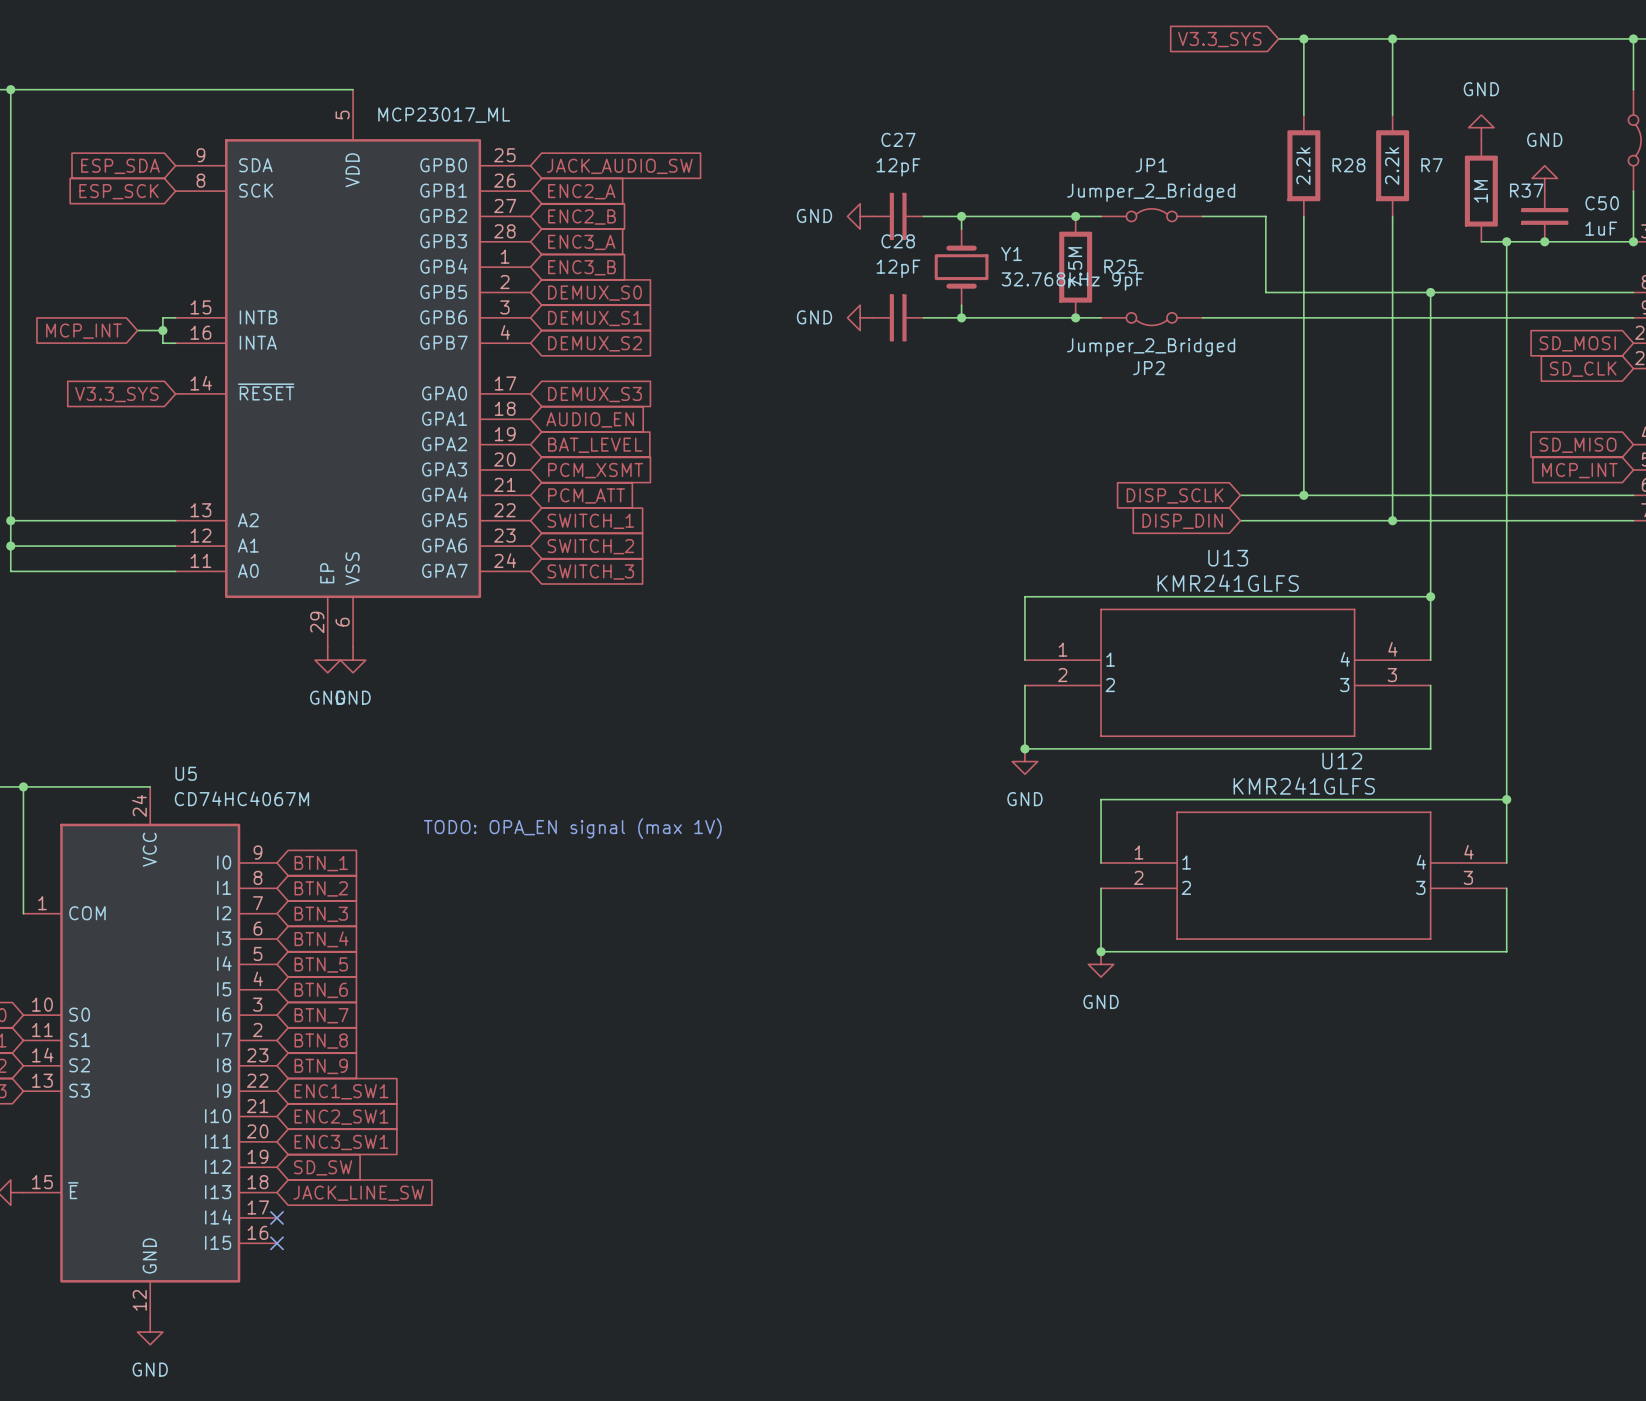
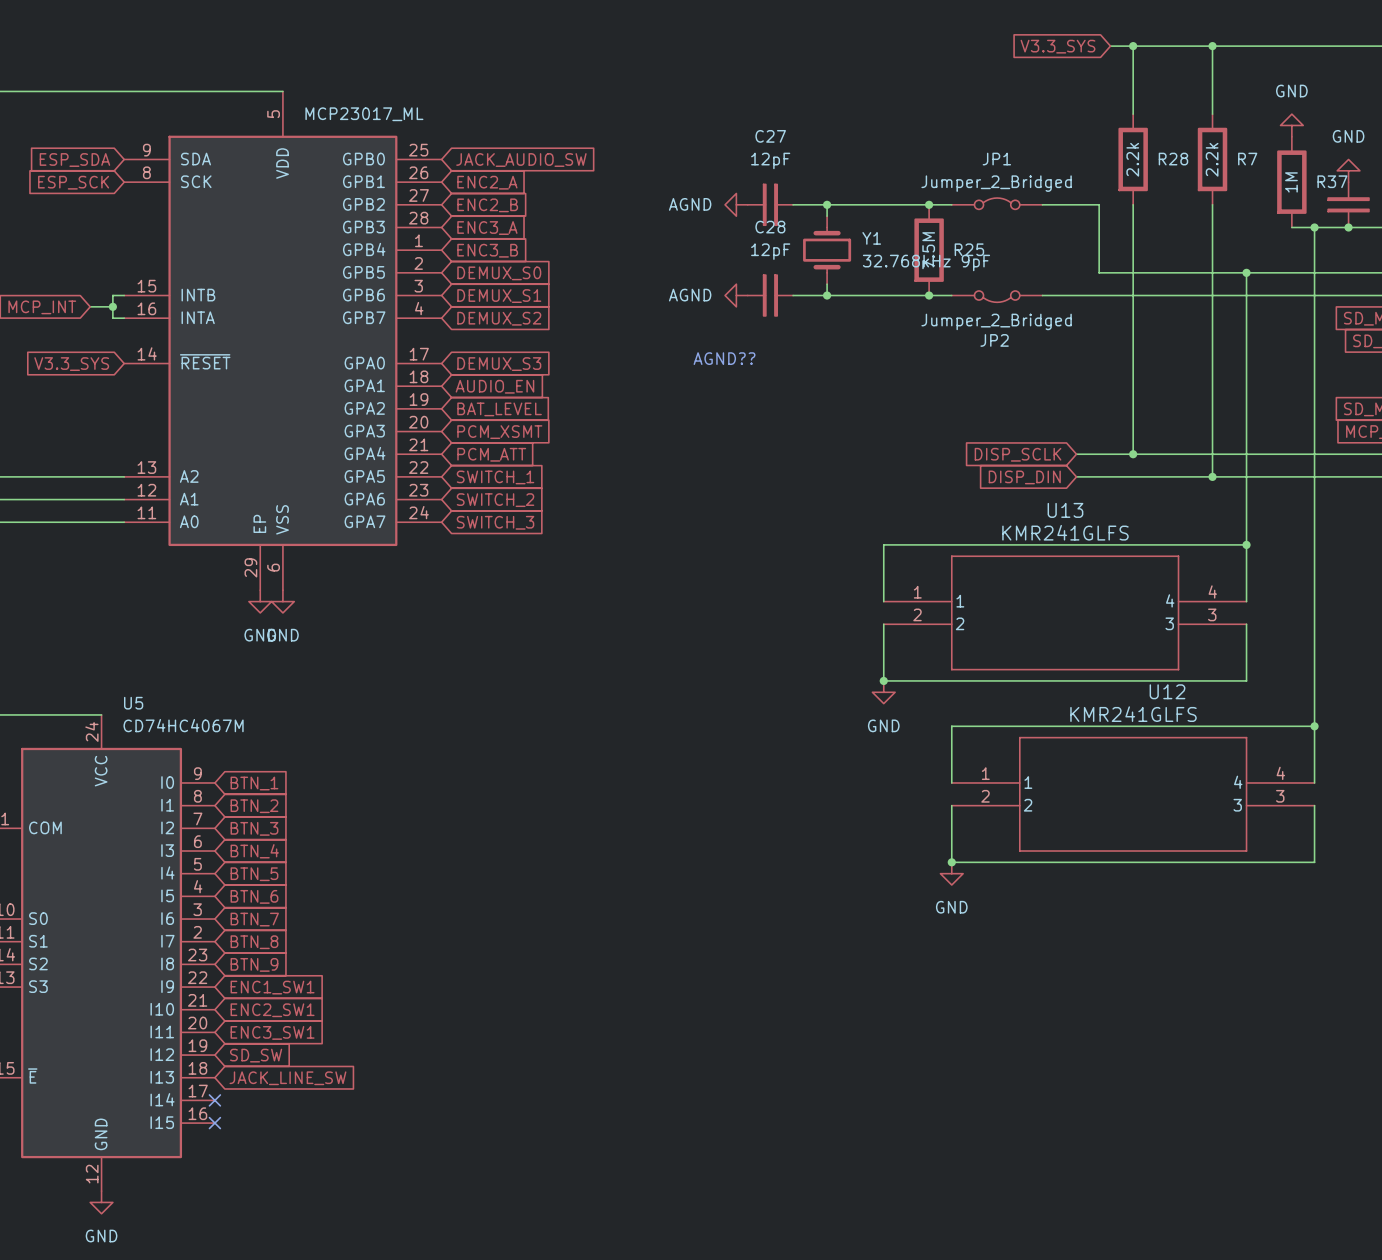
power symbol: GND (860, 216) -> AGND (736, 204)
power symbol: GND (860, 317) -> AGND (736, 295)
text: none -> AGND?? (724, 358)
text: TODO: OPA_EN signal (max 1V) (572, 828) -> none

